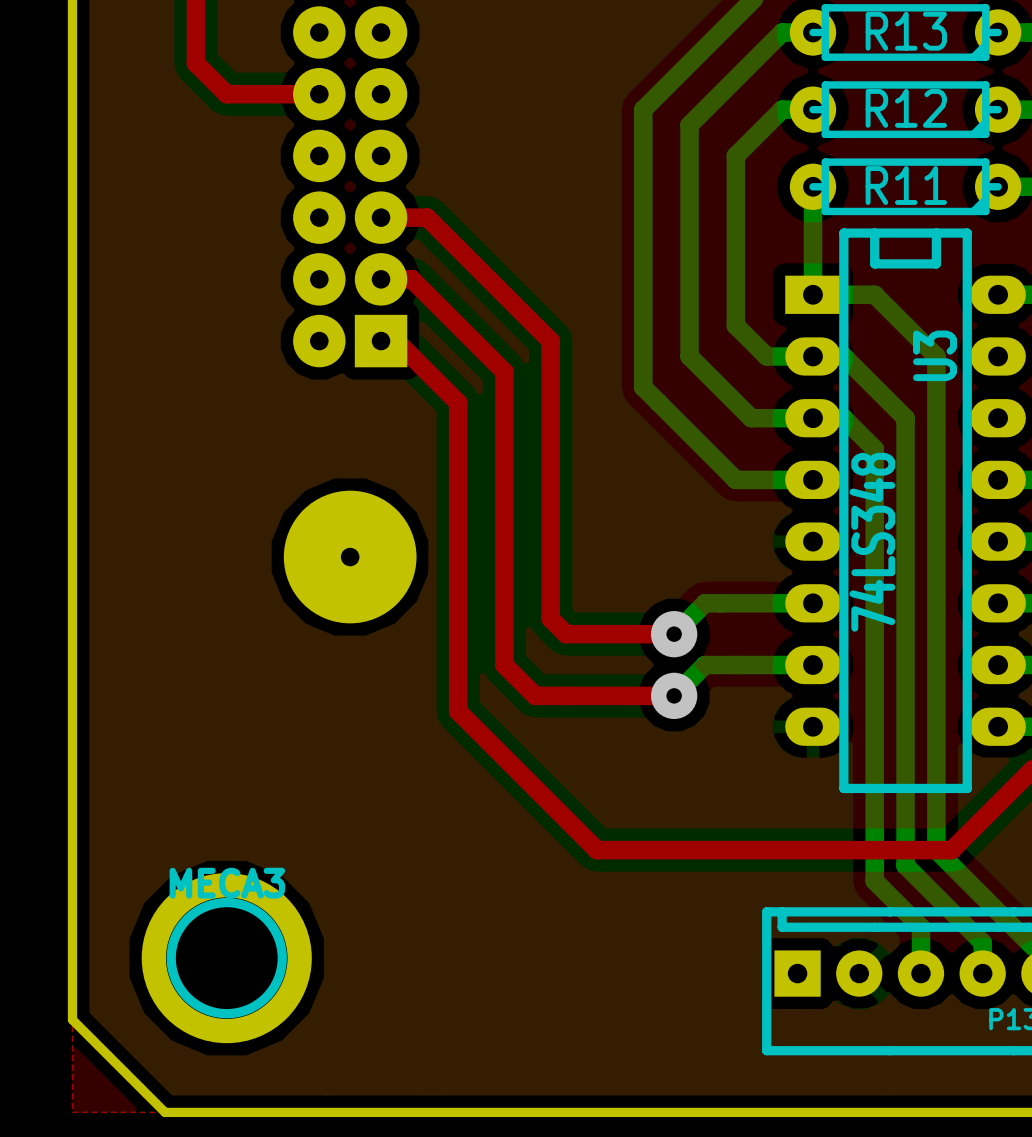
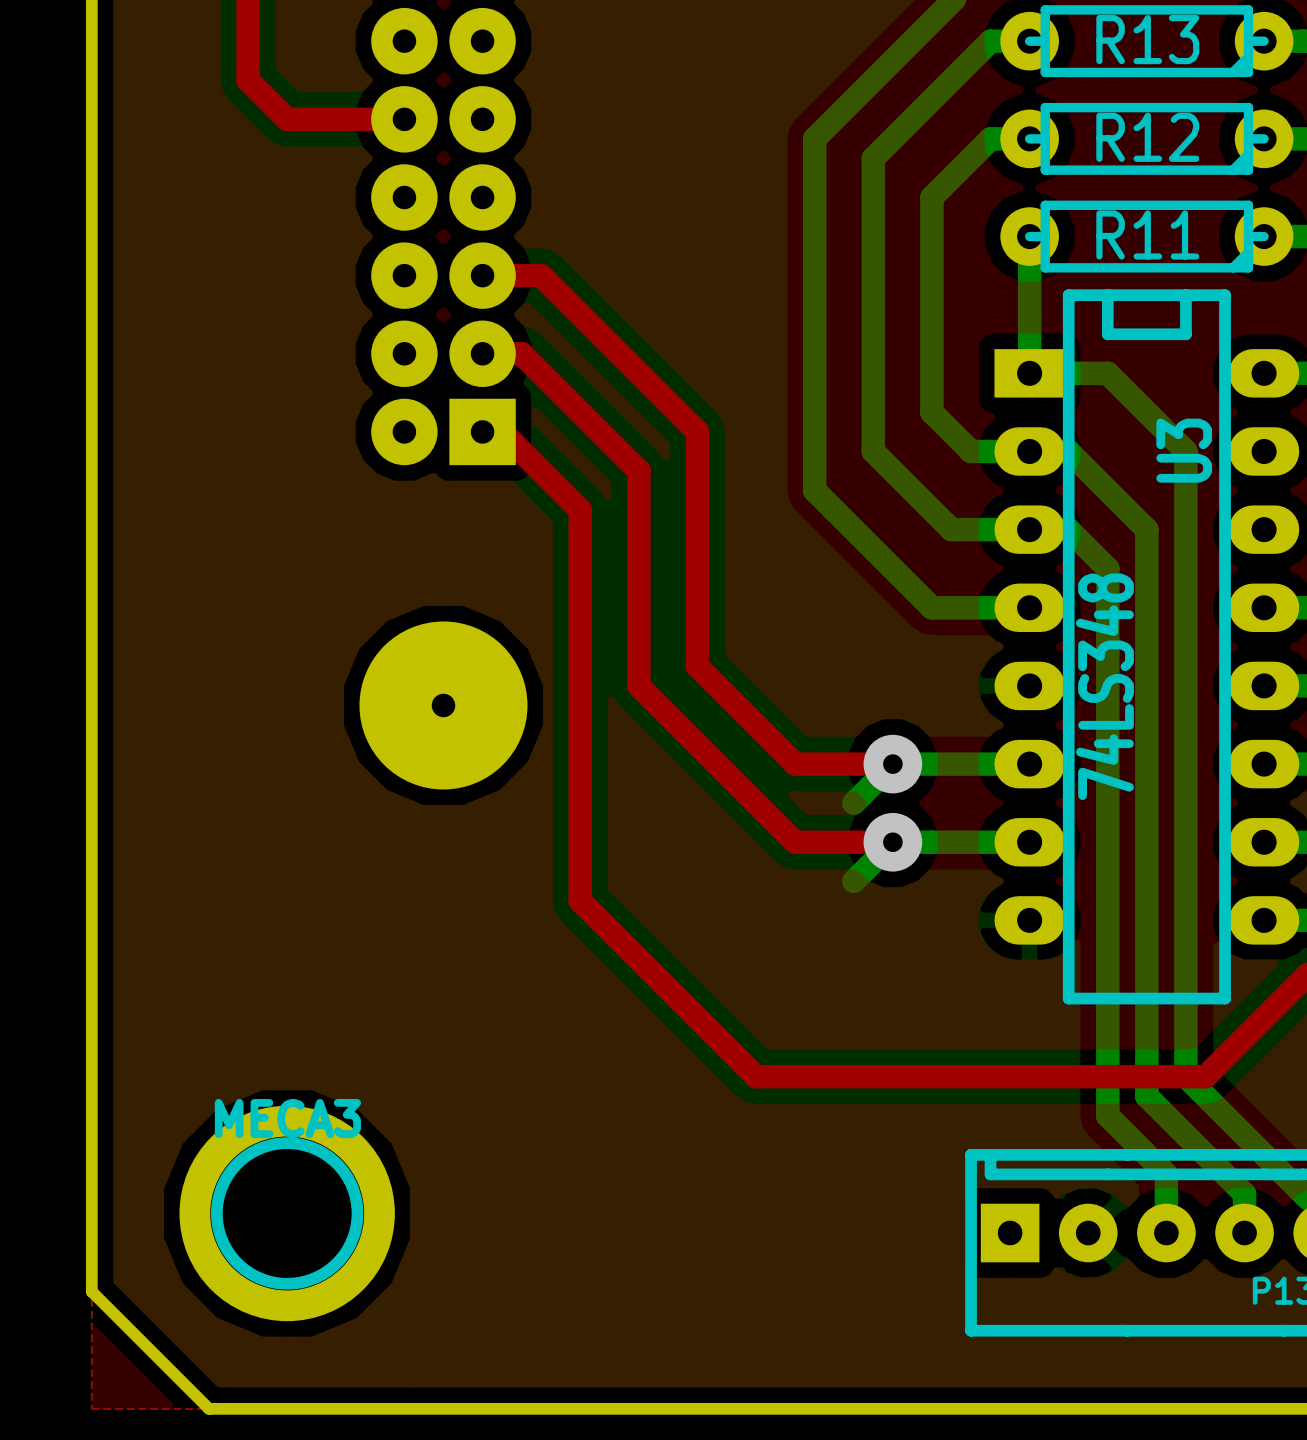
top track: (550, 526) (550, 618) (566, 634) (674, 634) -> (697, 666) (795, 764) (892, 764)
top track: (504, 541) (504, 665) (535, 695) (674, 695) -> (638, 685) (795, 842) (892, 842)
via: none -> (892, 764)
via: (674, 634) -> none
via: none -> (892, 842)
via: (674, 695) -> none

